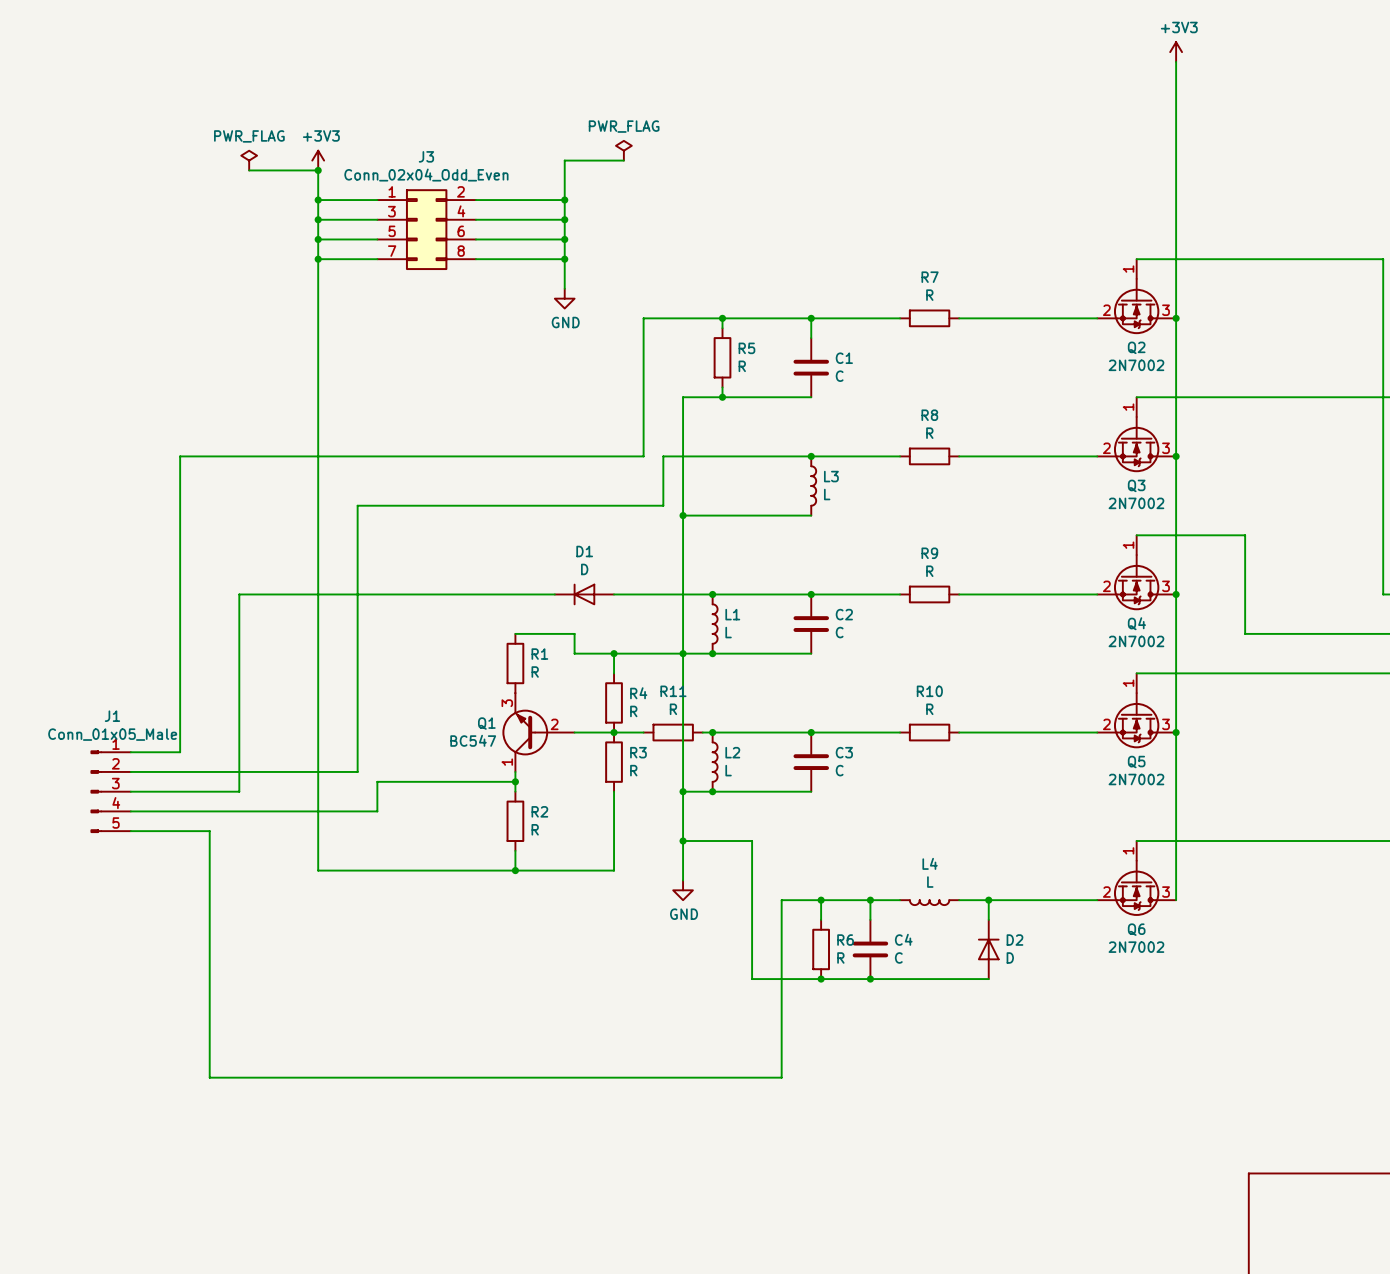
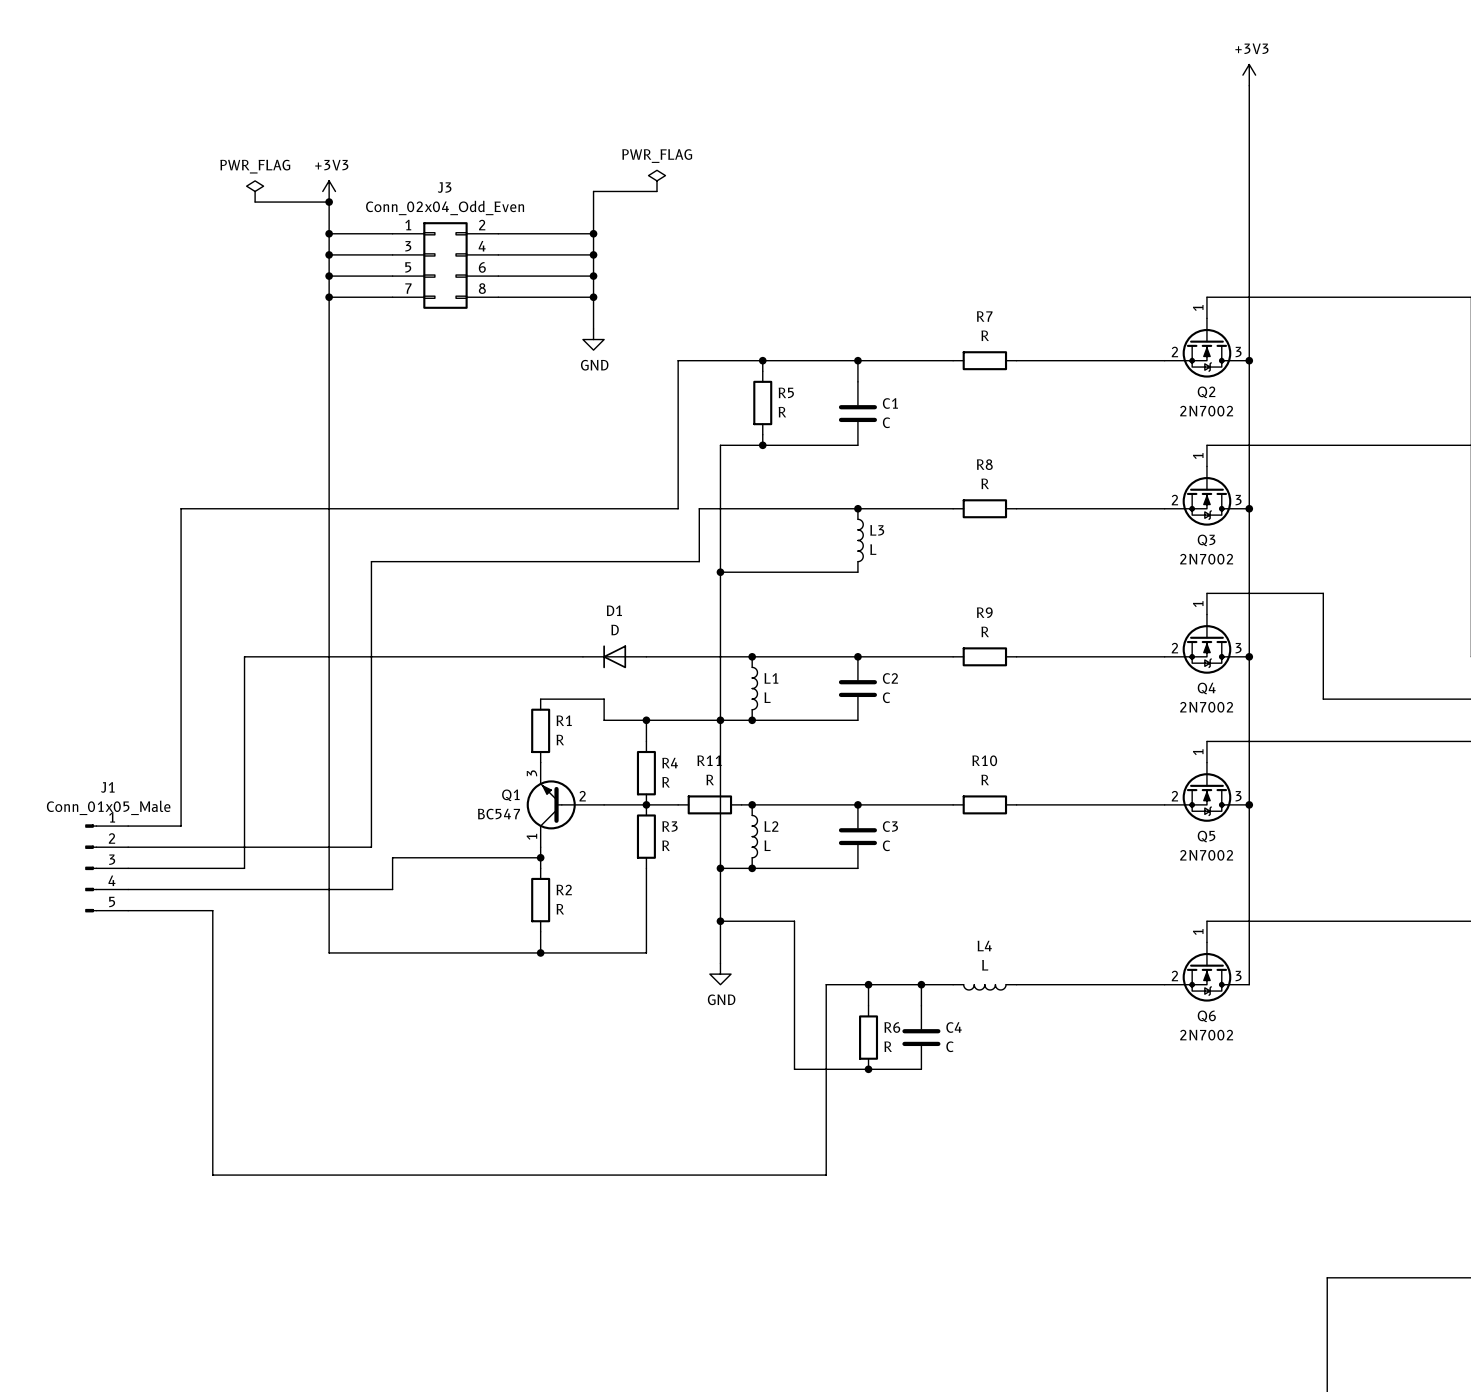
wire: (988, 900) (988, 919) -> none
junction: (988, 900) -> none
D2: D (988, 949) -> none
wire: (870, 979) (988, 979) -> none
junction: (870, 979) -> none

